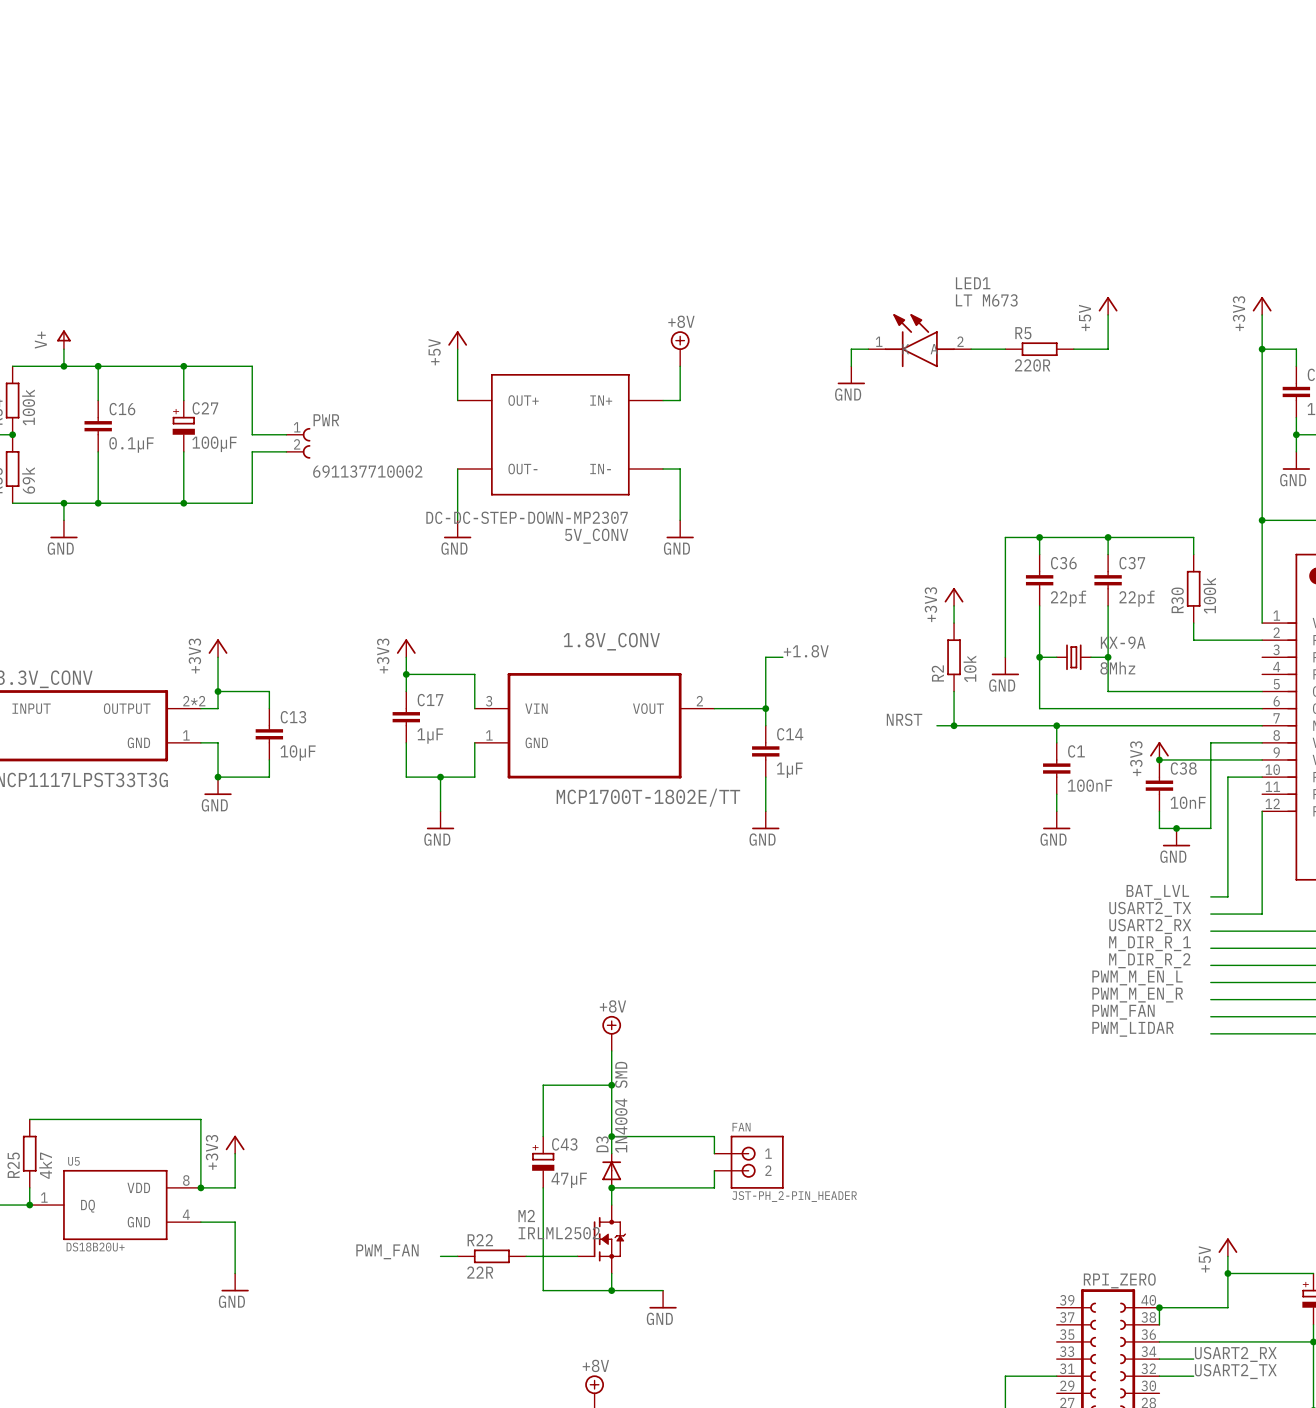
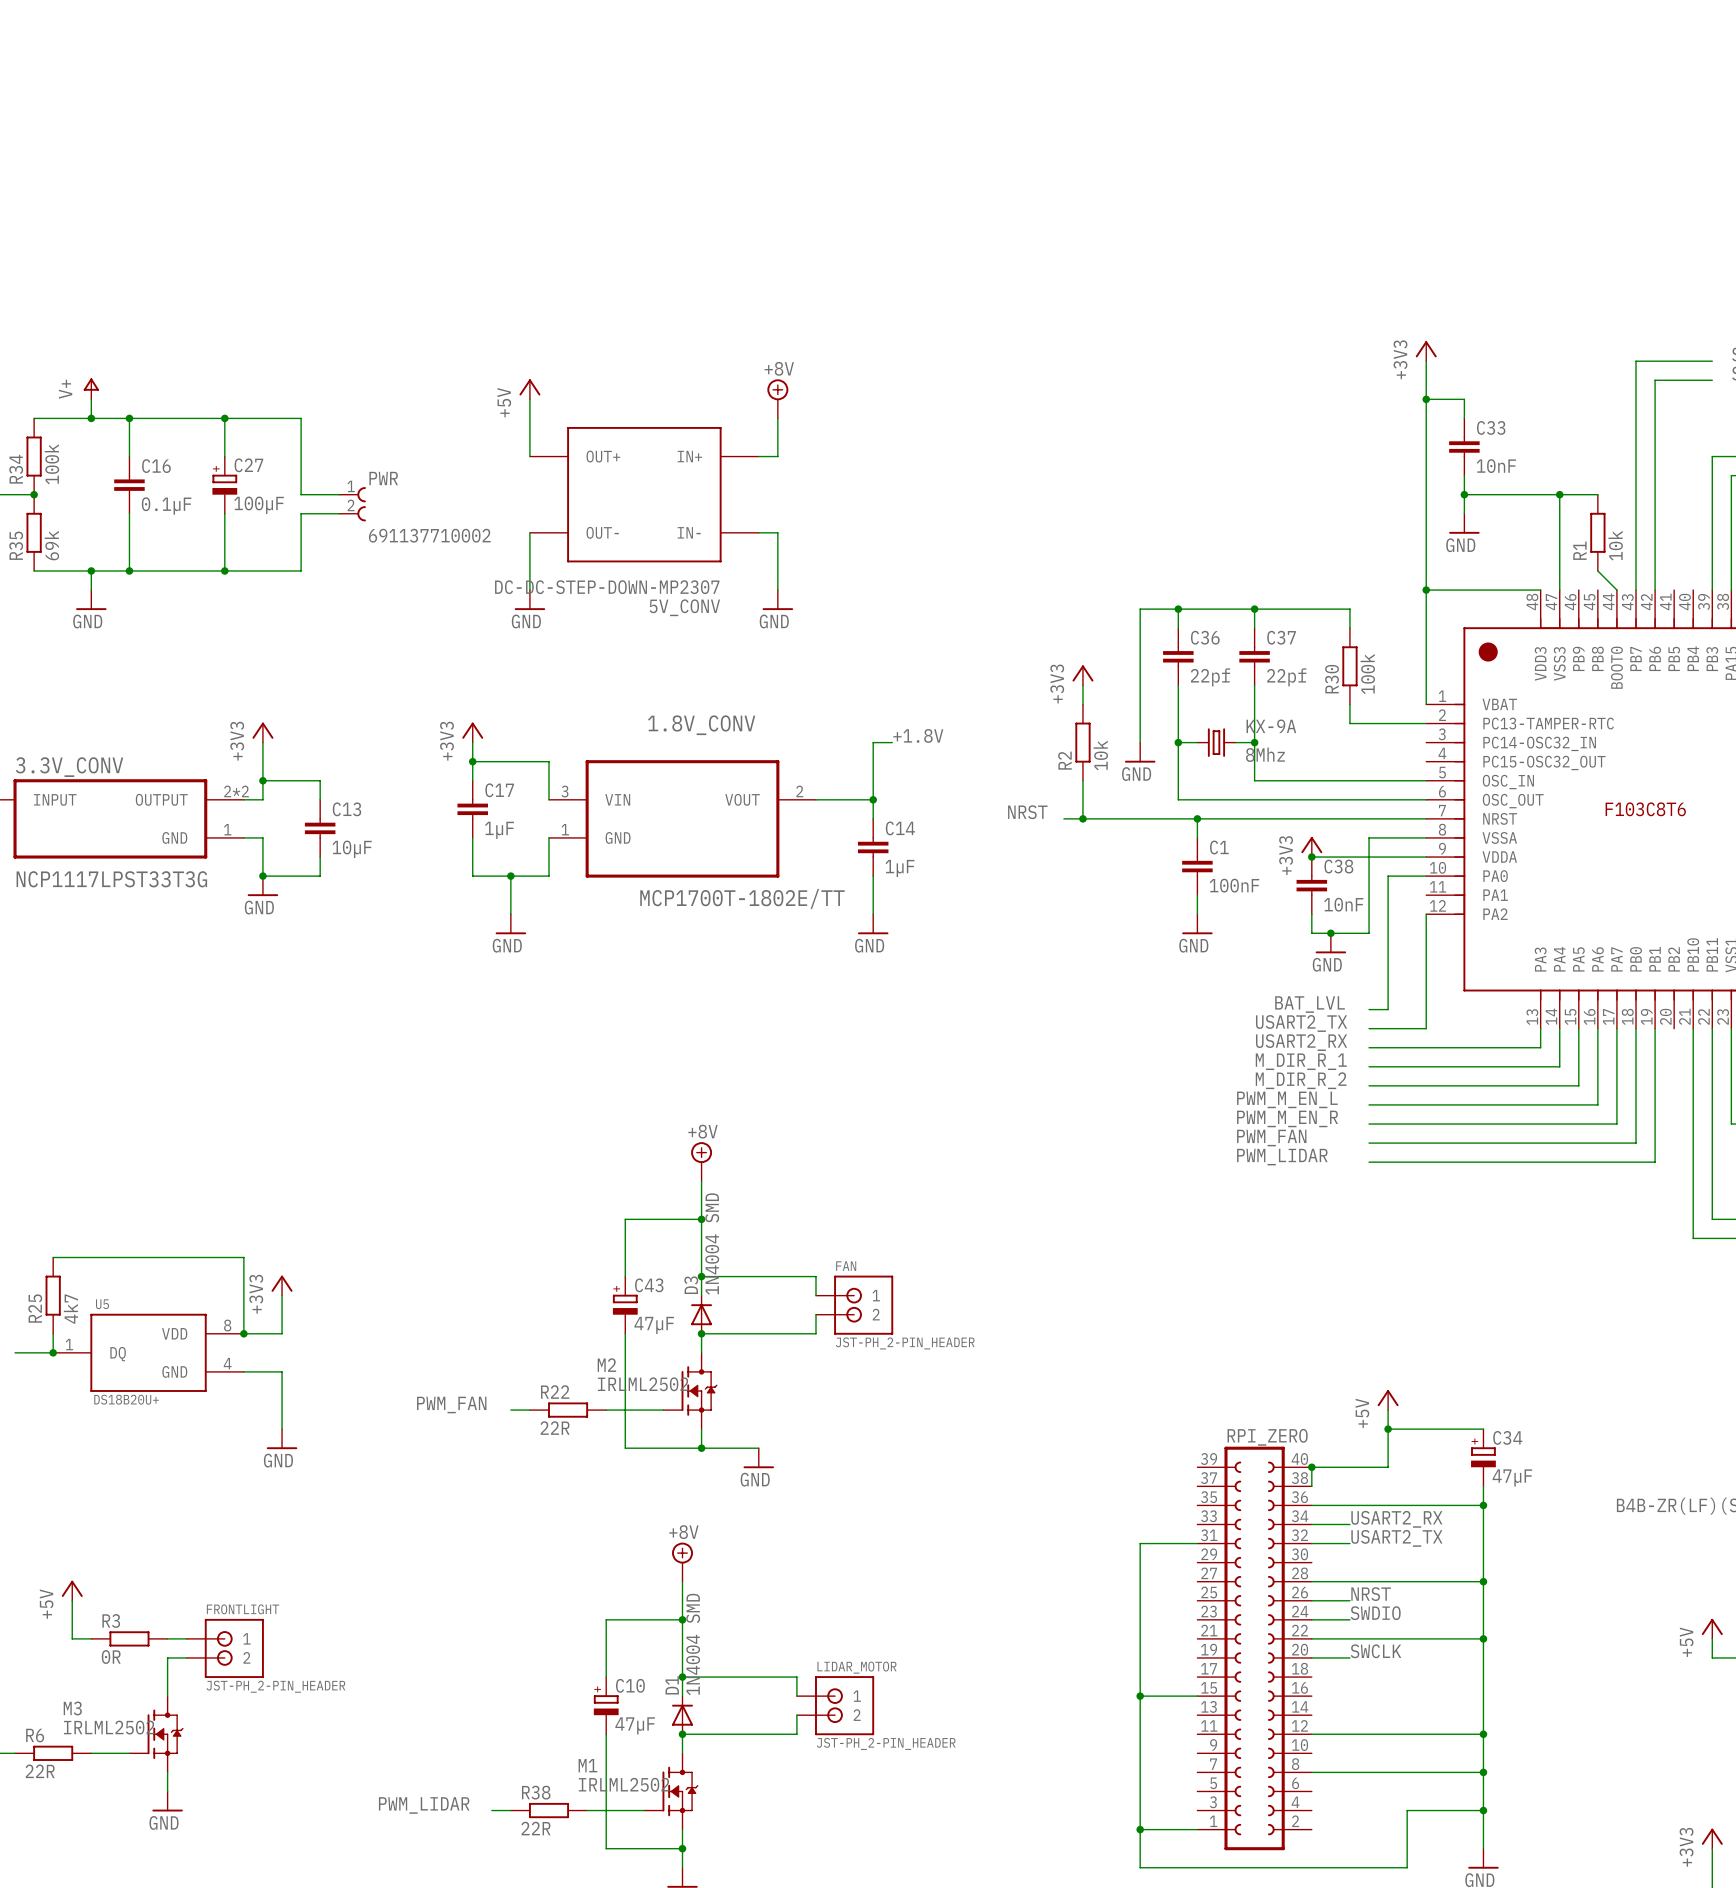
power symbol: +5V (1108, 305) -> none
wire: (1108, 314) (1108, 349) (1073, 349) -> none
LED1: LT M673 (919, 340) -> none
wire: (868, 349) (851, 349) (851, 366) -> none
wire: (971, 349) (1005, 349) -> none
R5: 220R (1039, 349) -> none
power symbol: GND (851, 375) -> none

